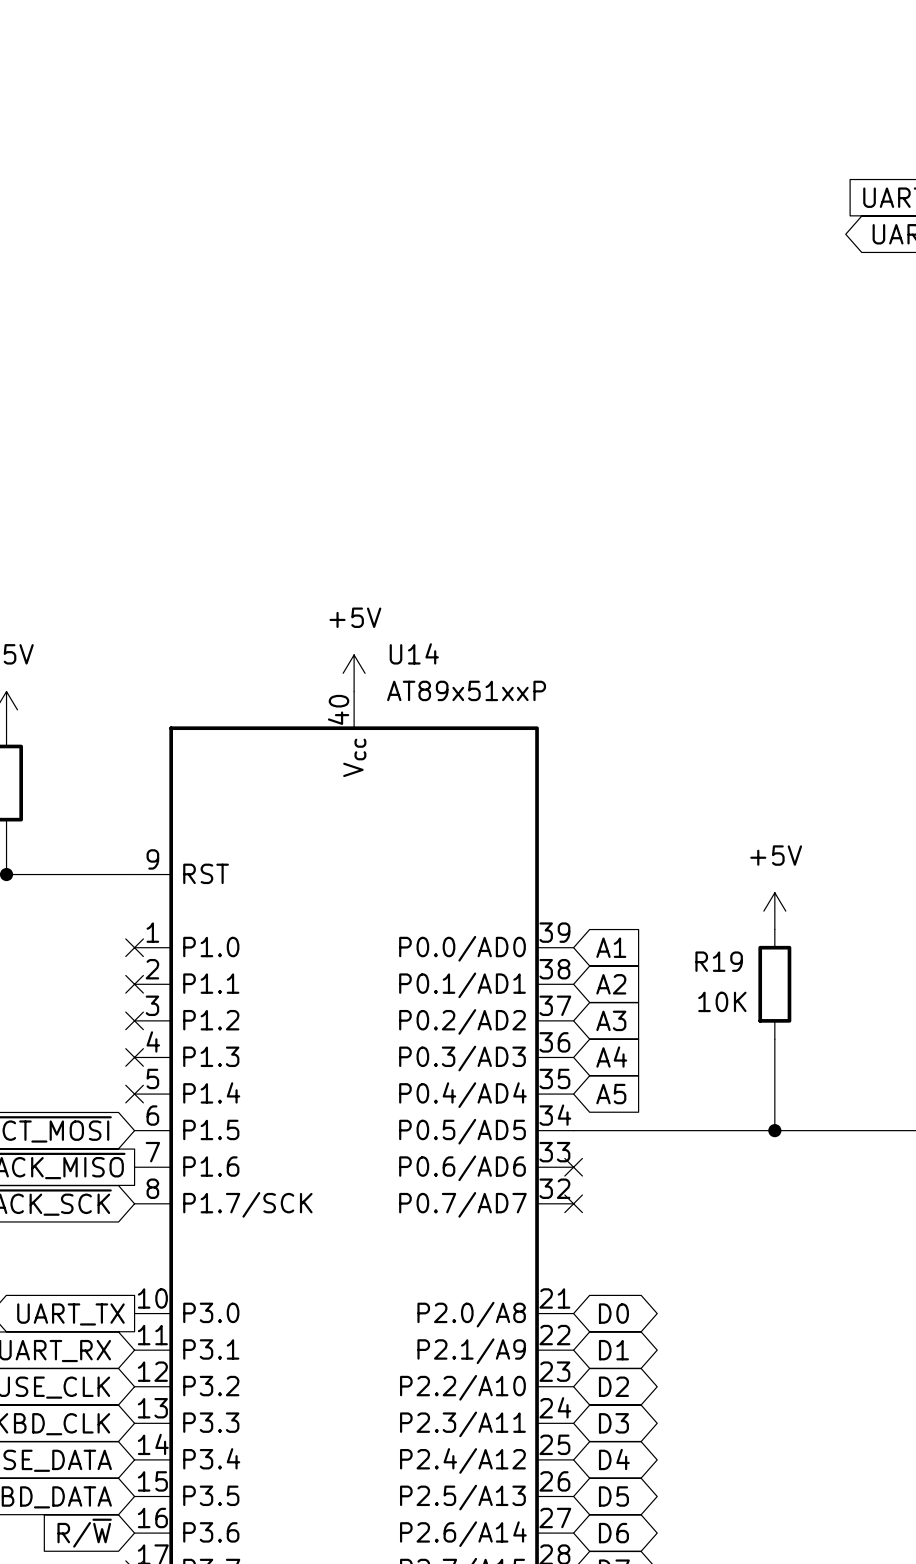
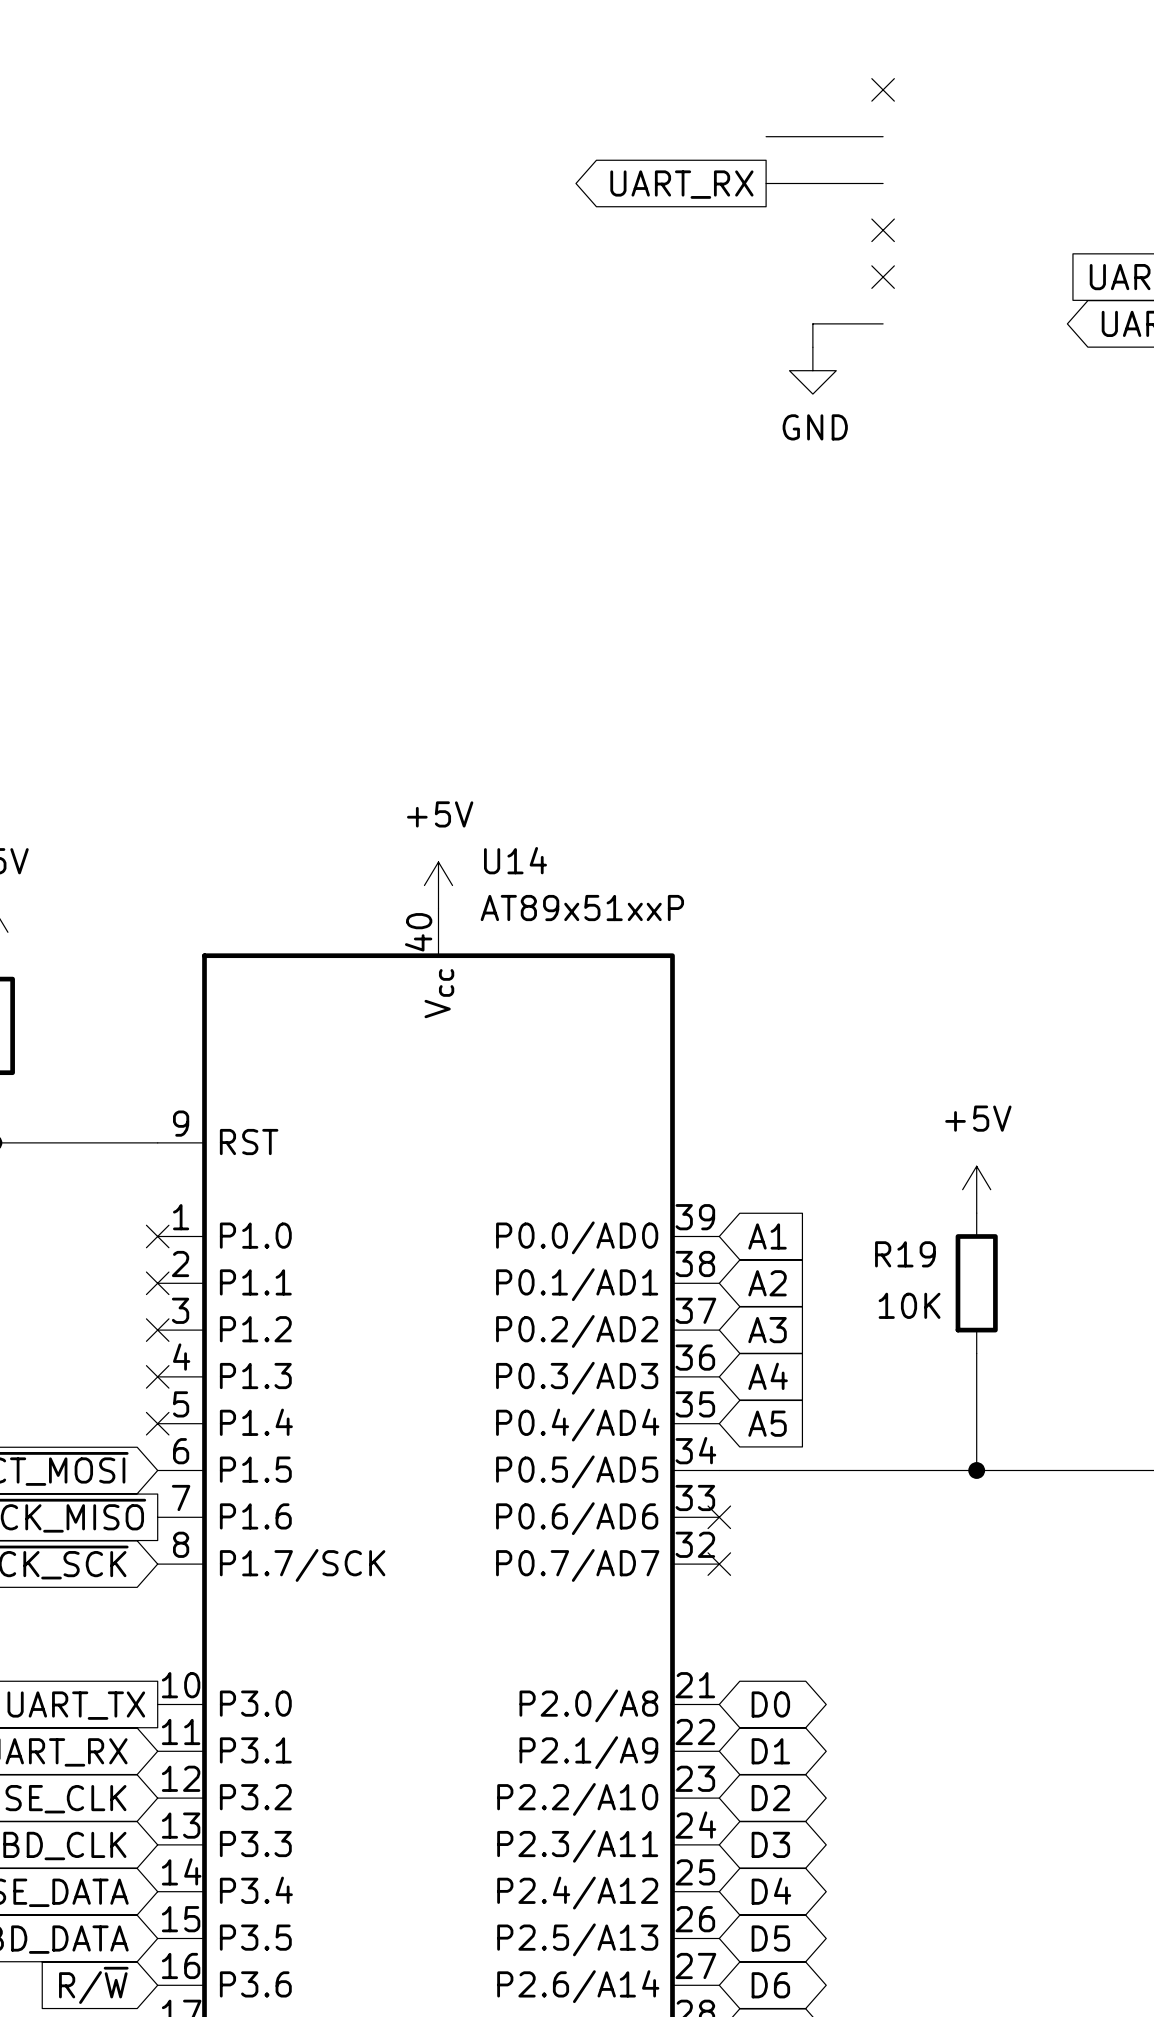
no-connect mark: none -> (883, 89)
wire: none -> (766, 136) (883, 136)
wire: none -> (766, 183) (883, 183)
global label: none -> UART_RX (681, 184)
no-connect mark: none -> (883, 230)
no-connect mark: none -> (883, 277)
wire: none -> (883, 323) (812, 323) (812, 347)
power symbol: none -> GND (812, 370)

